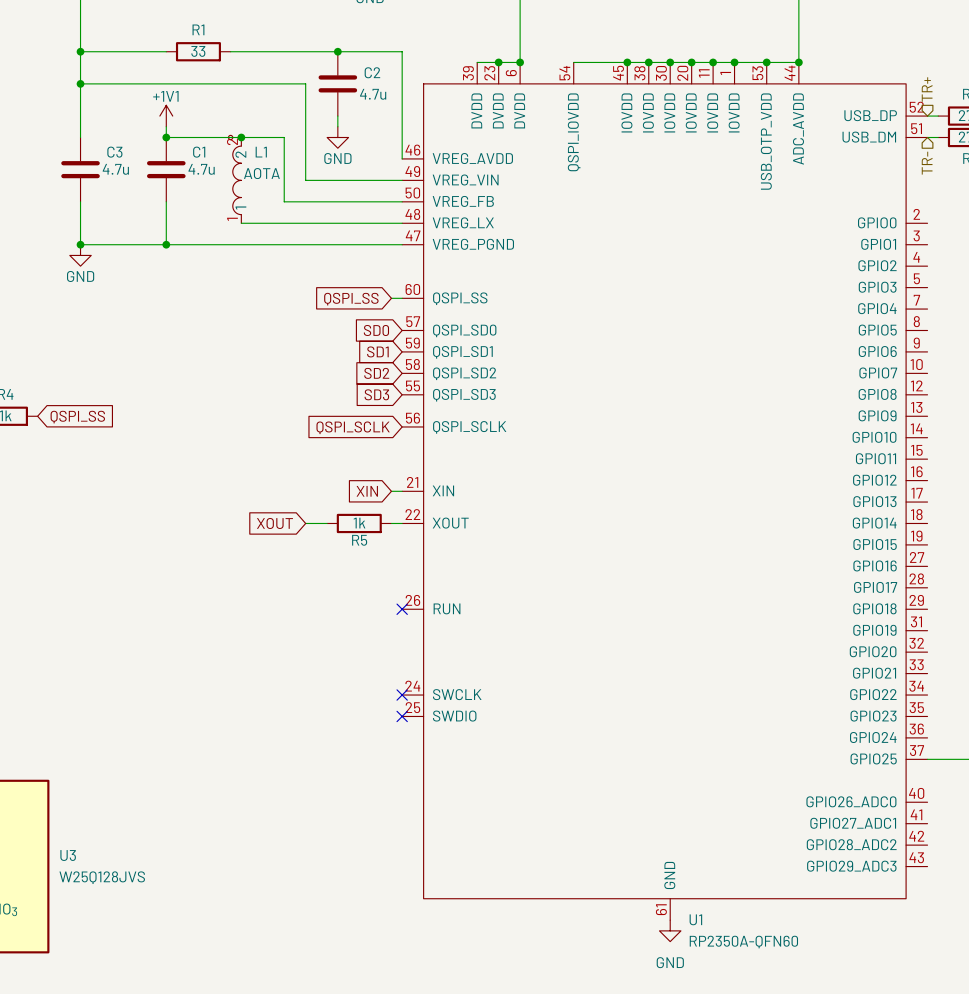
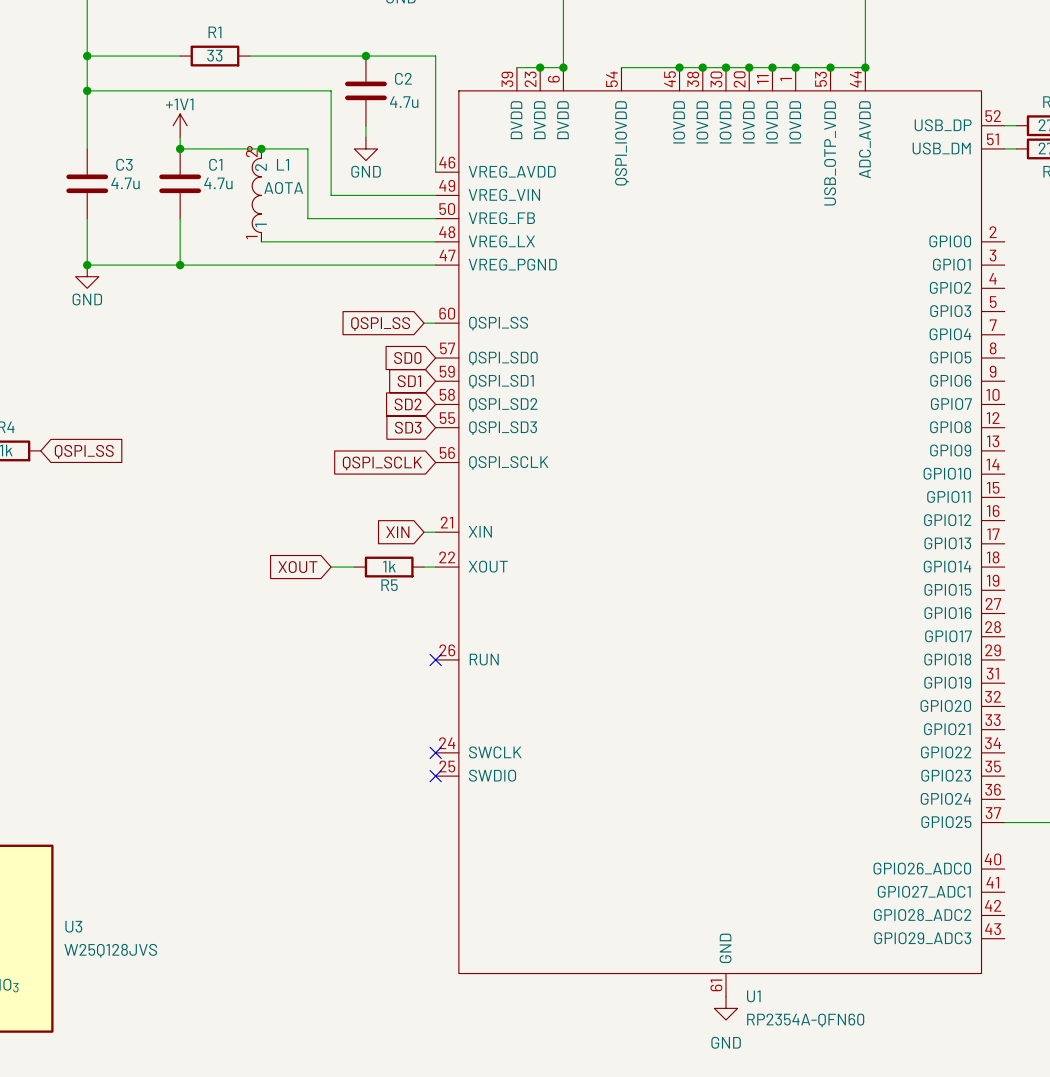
hierarchical label: TR+ (927, 89) -> none
hierarchical label: TR- (927, 163) -> none
U1 value: RP2350A-QFN60 (743, 942) -> RP2354A-QFN60 (805, 1020)

